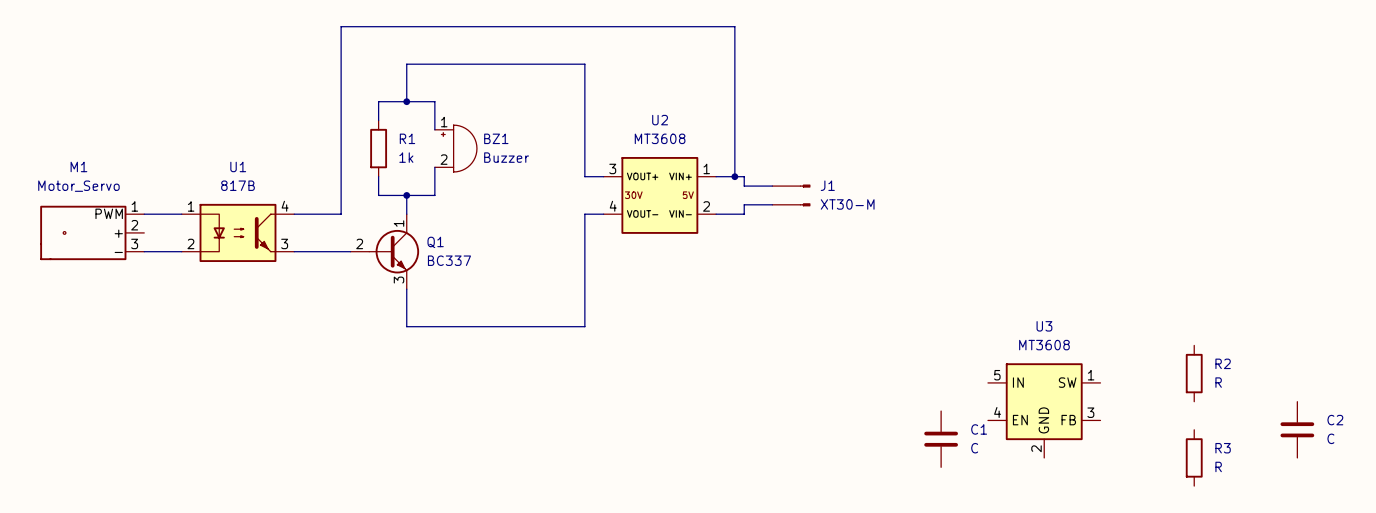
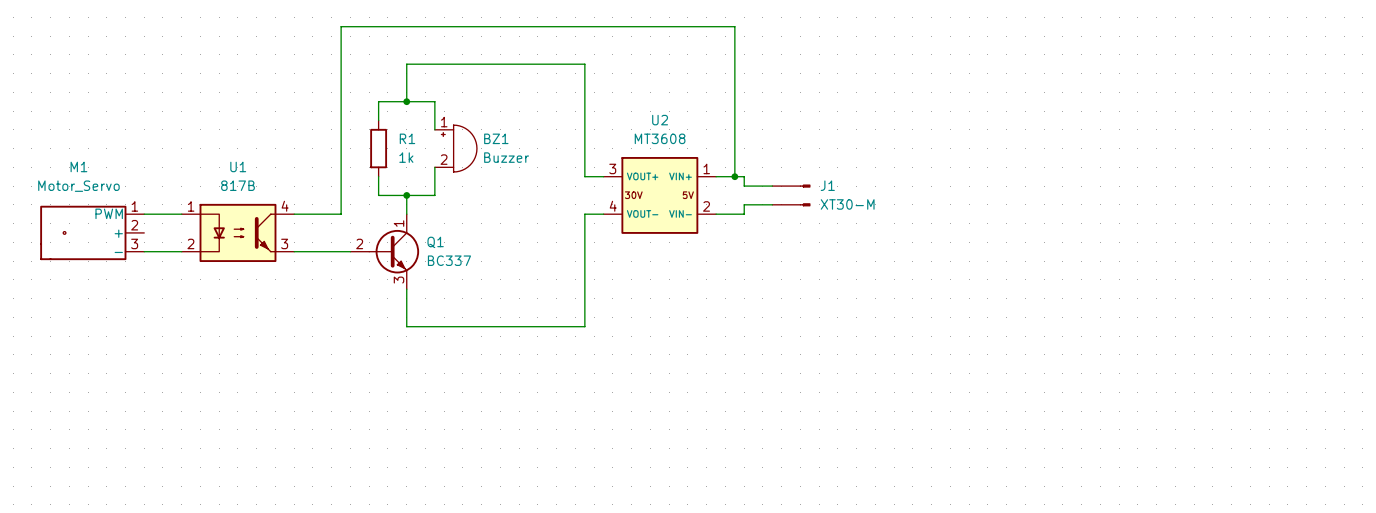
R2: R (1194, 373) -> none
U3: MT3608 (1044, 410) -> none
C2: C (1297, 429) -> none
C1: C (941, 439) -> none
R3: R (1194, 457) -> none

